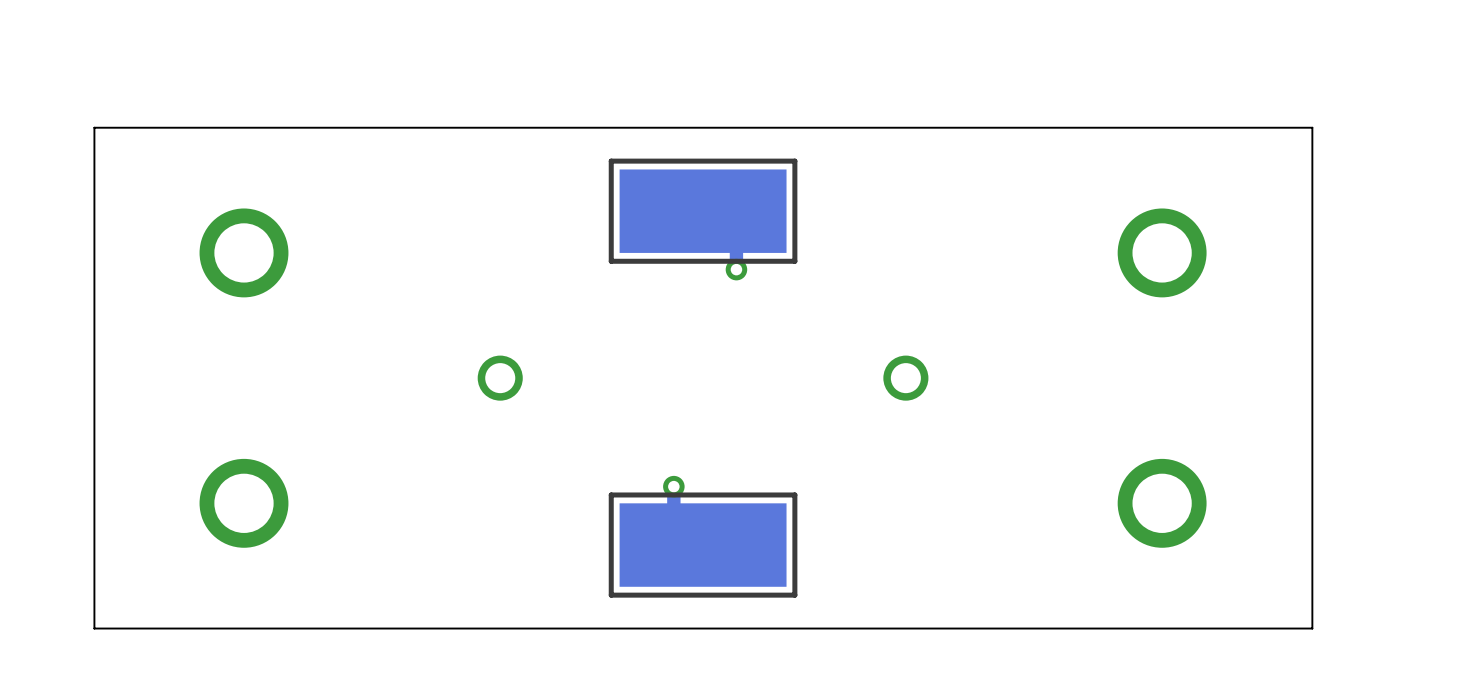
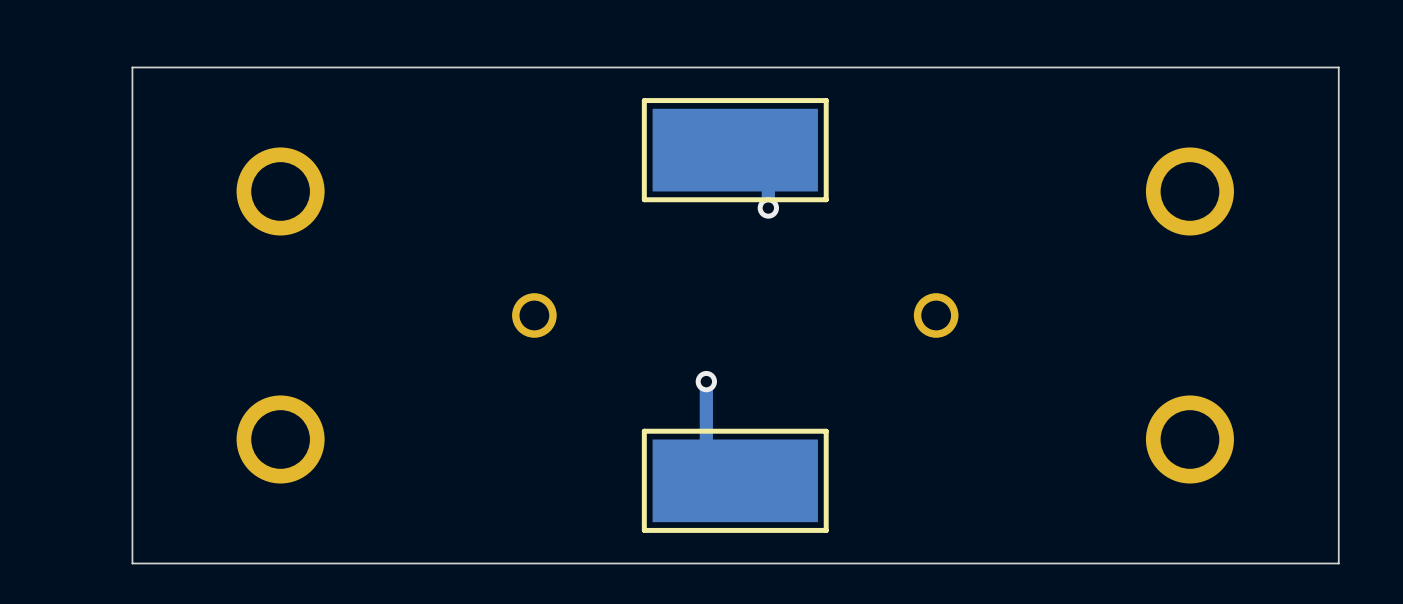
track: none -> (706, 381) (706, 422)
via position: (673, 486) -> (706, 381)

